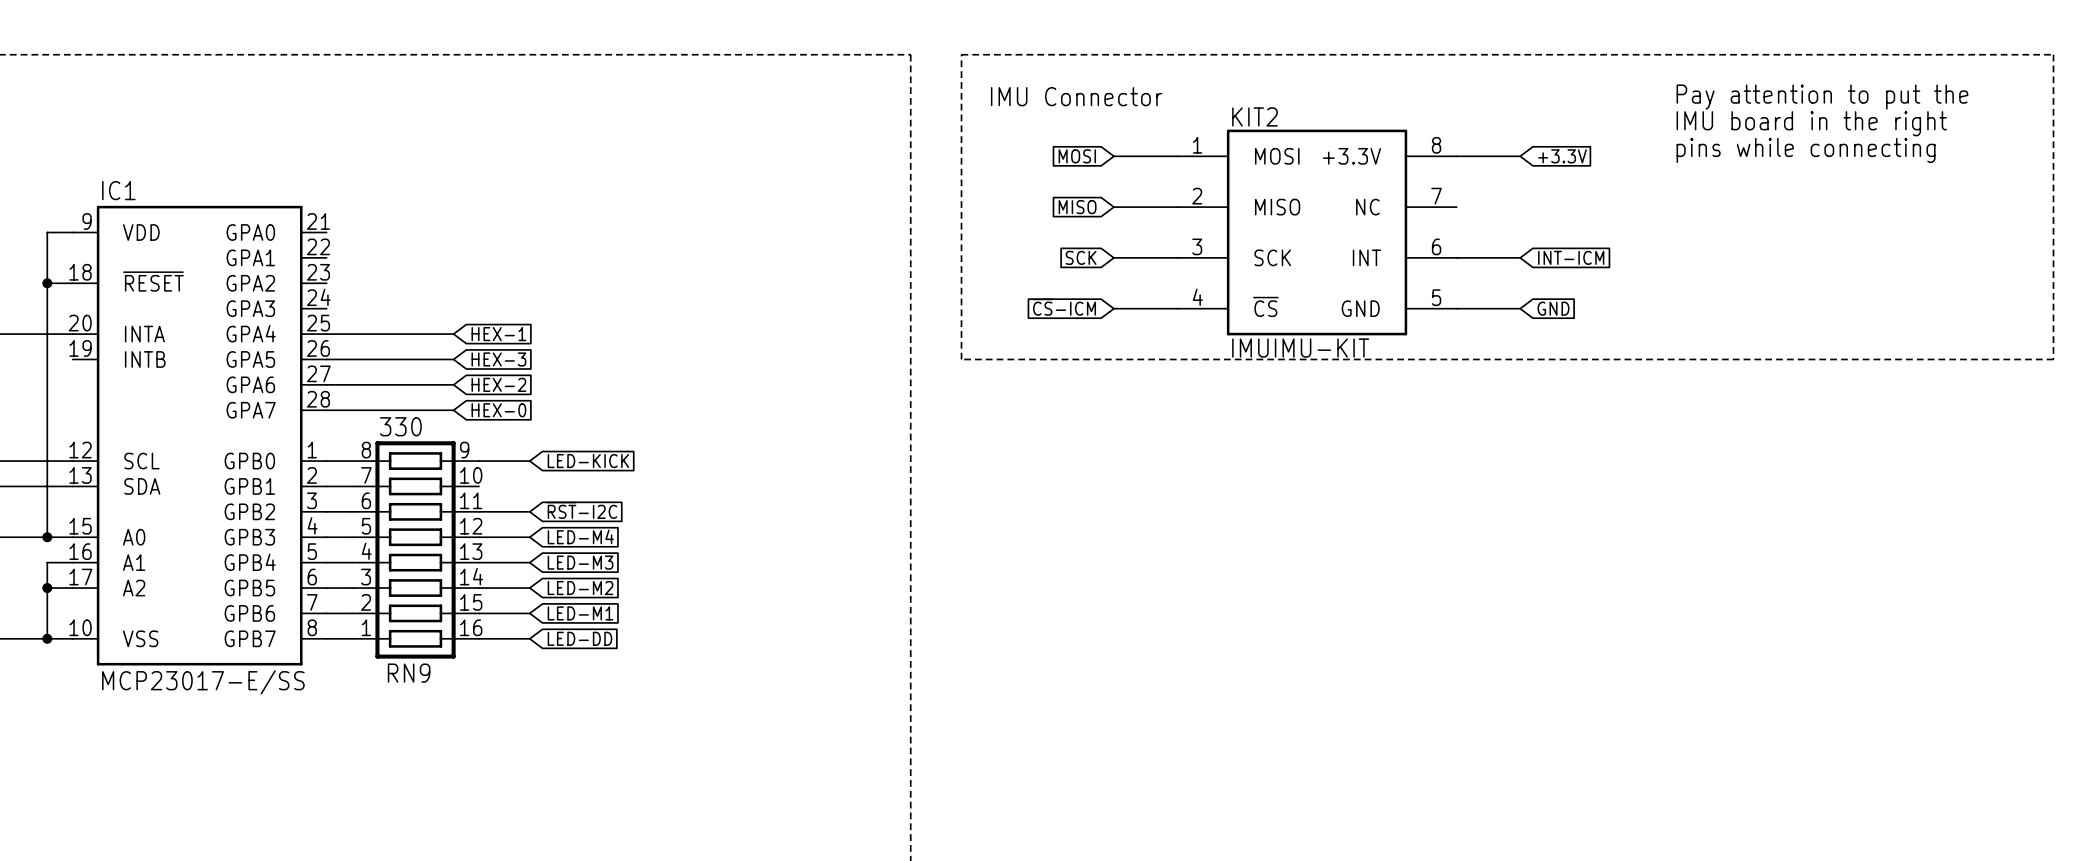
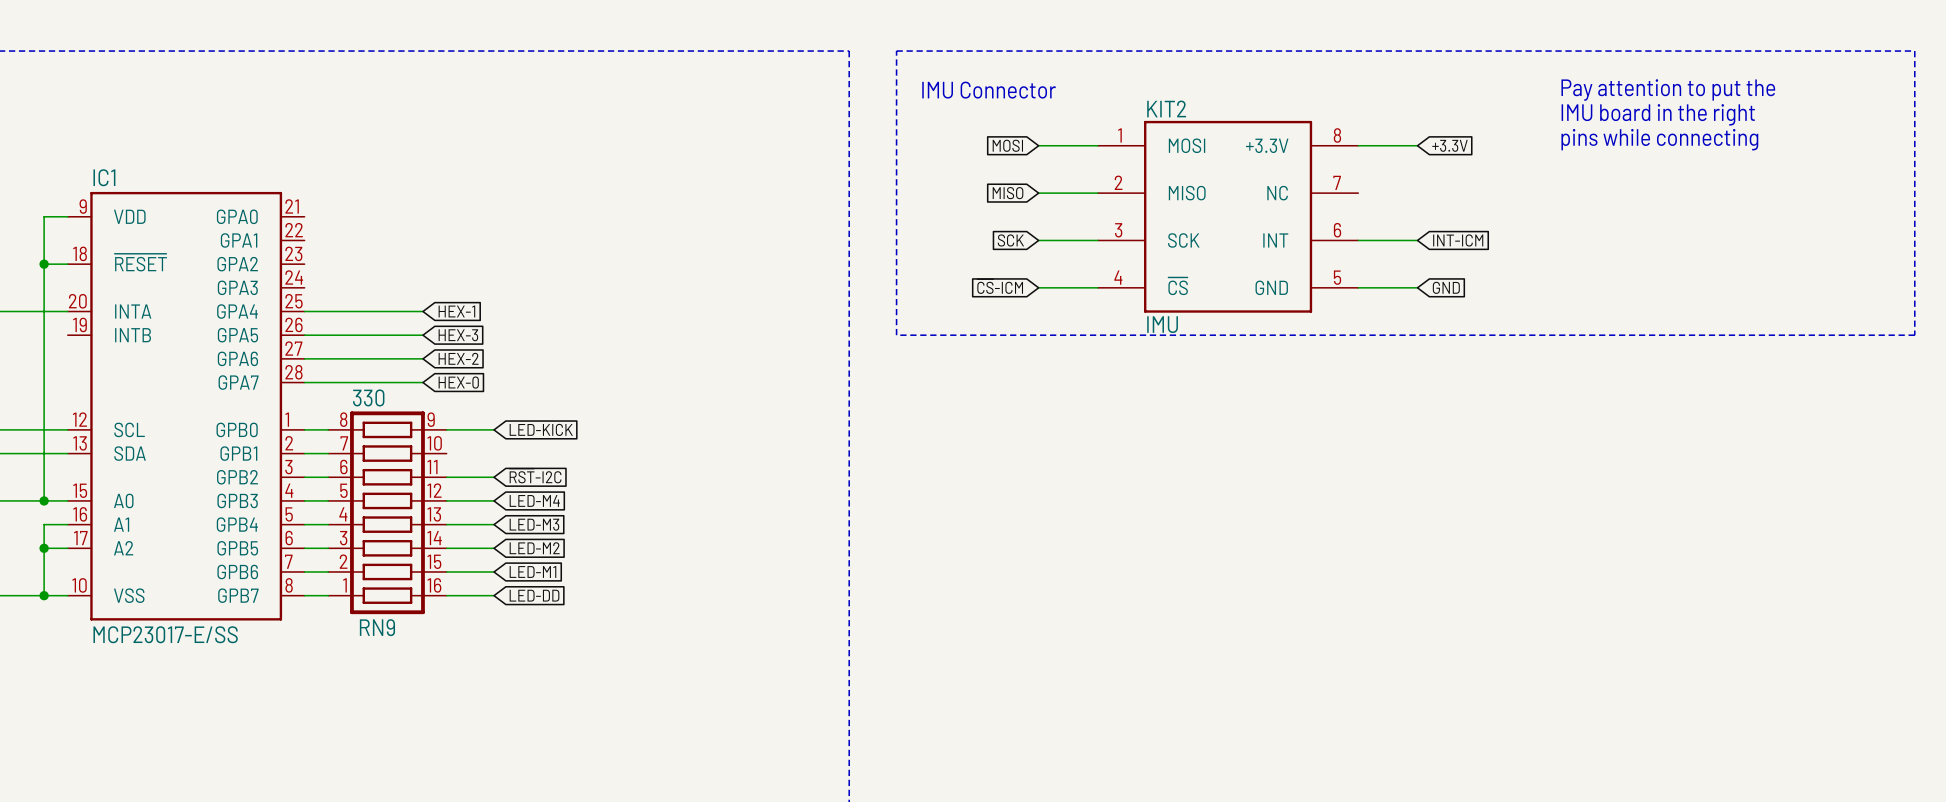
KIT2 value: IMUIMU-KIT (1300, 348) -> IMU (1162, 324)

